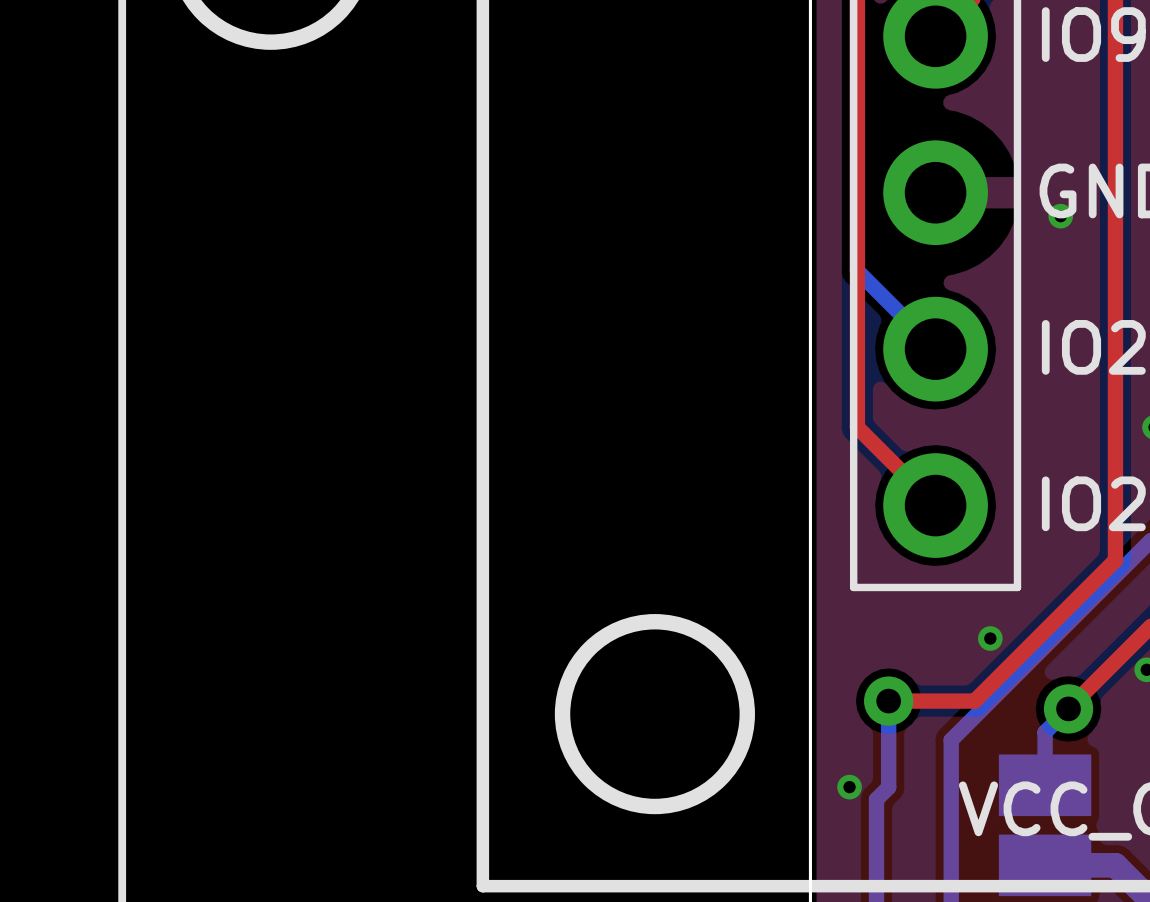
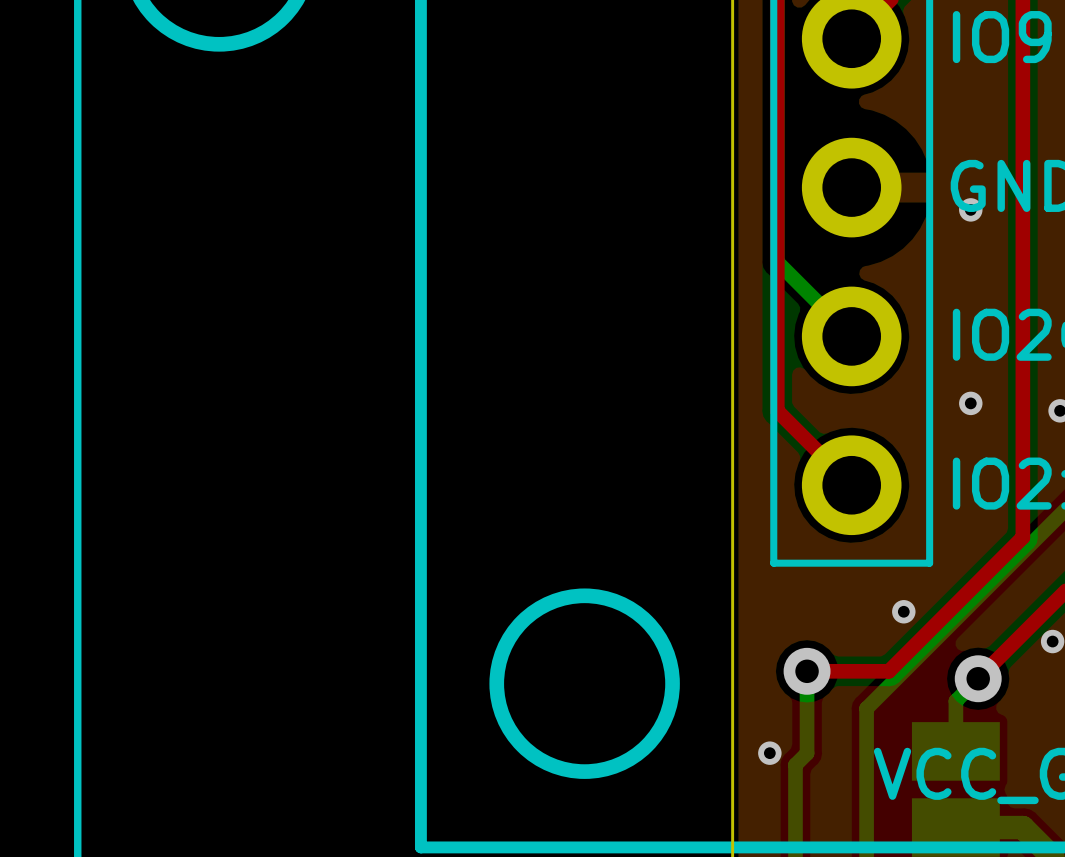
via: none -> (970, 403)

